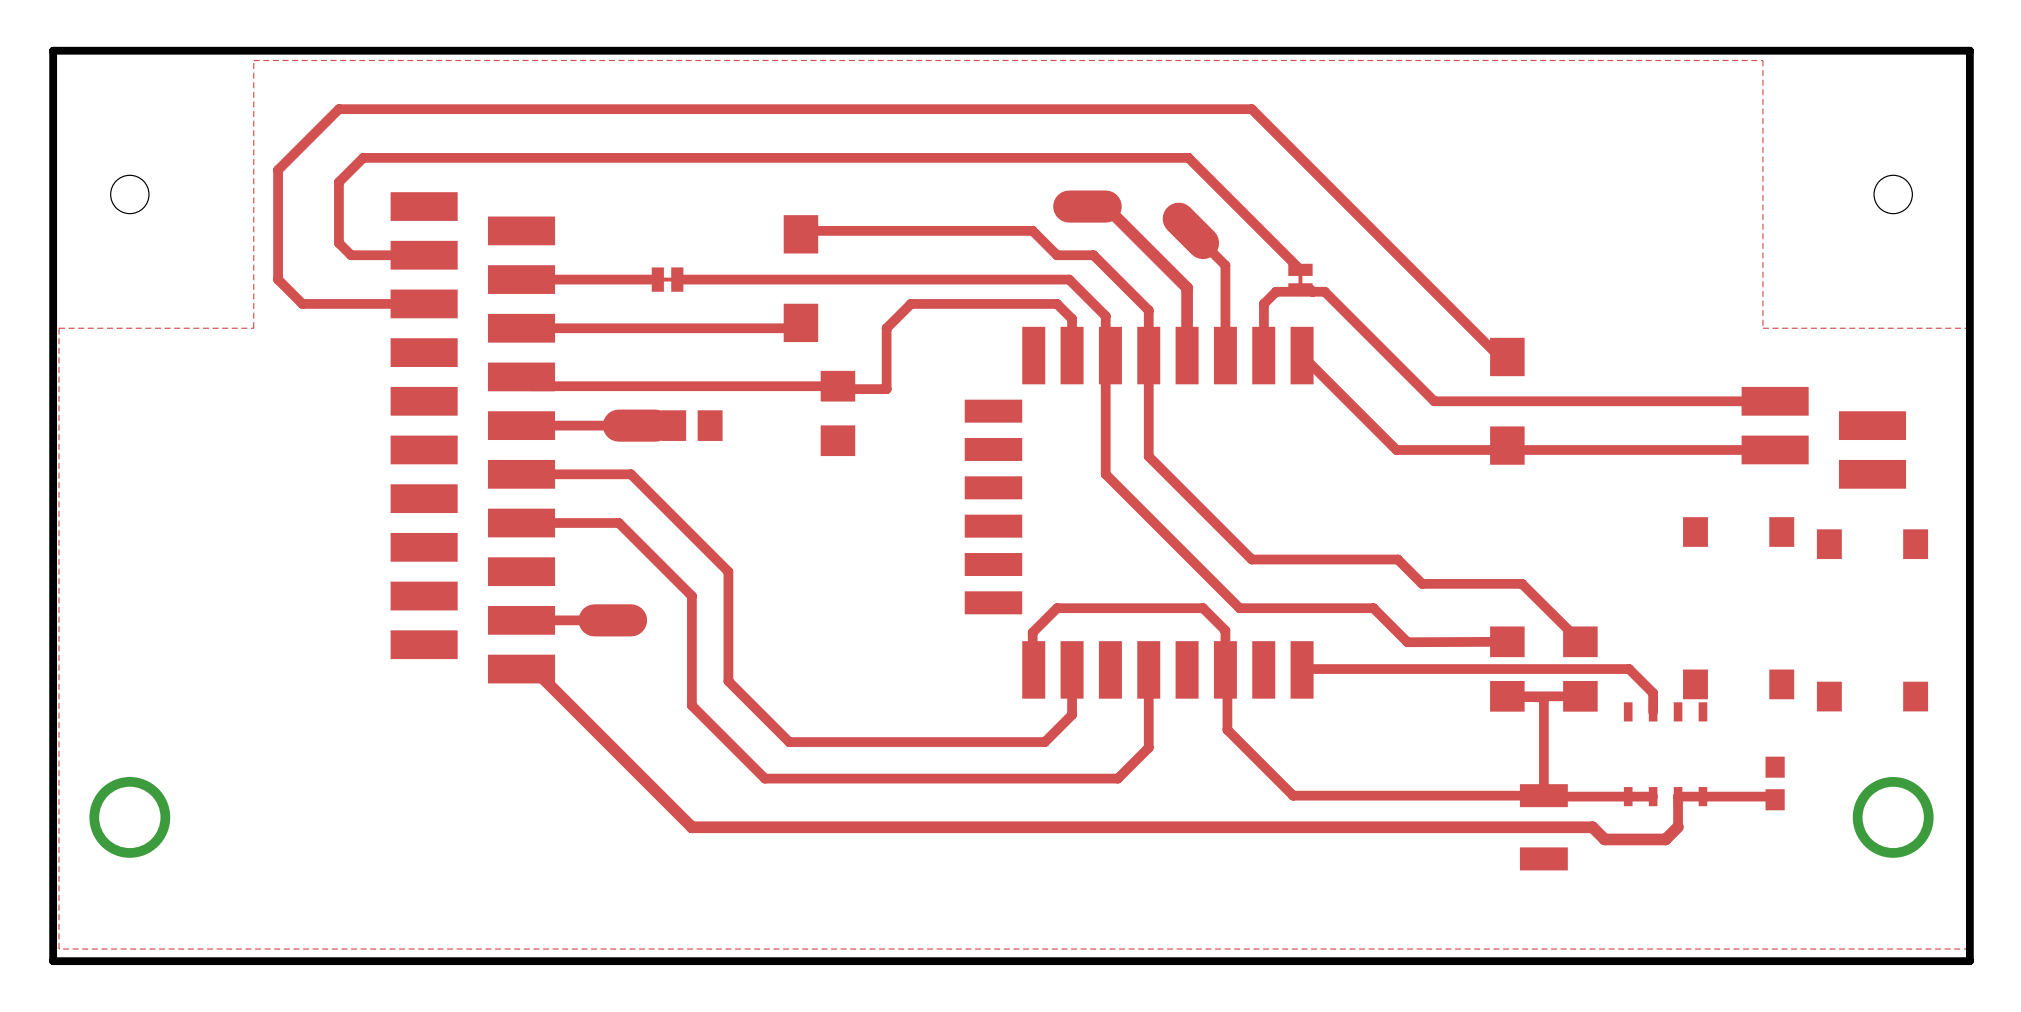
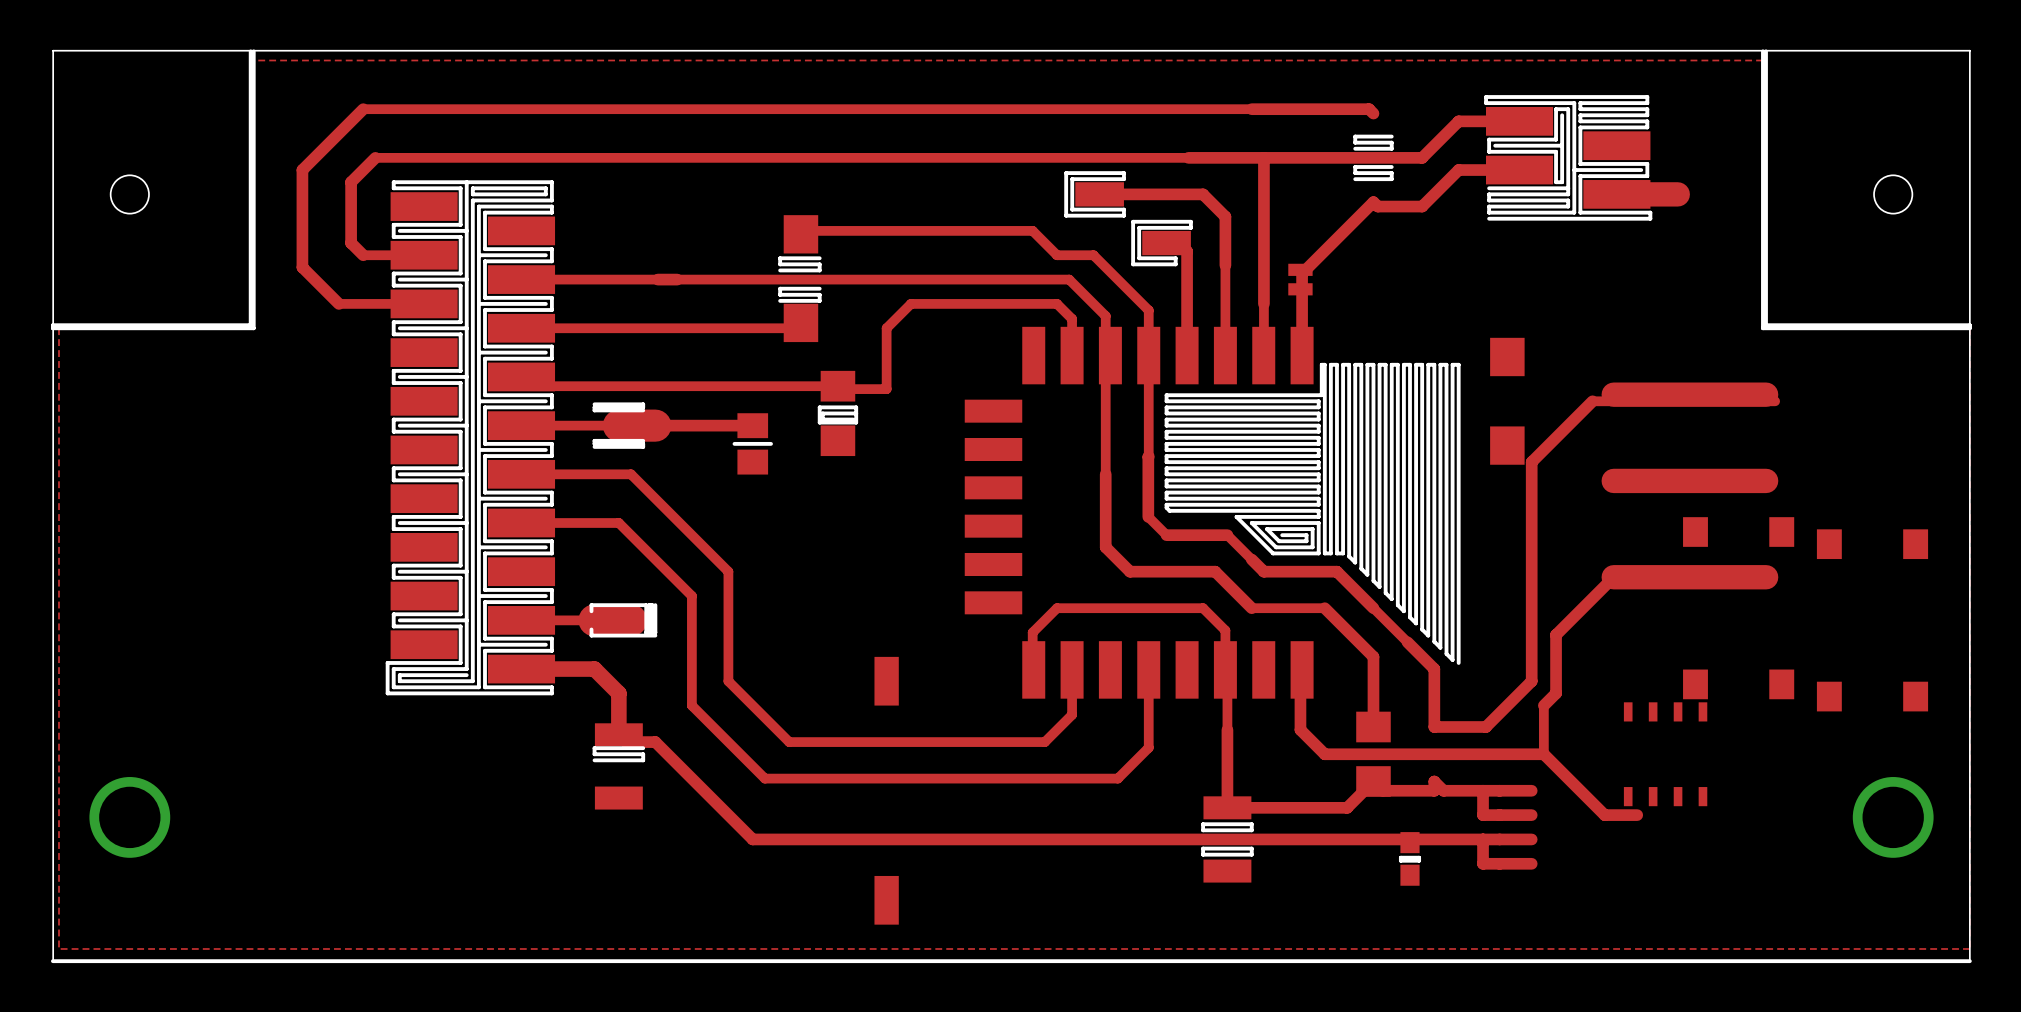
board edge width: thick (1969, 50) (53, 50) (53, 961) (1969, 961) (1969, 50) -> thin (1969, 50) (53, 50) (53, 961) (1969, 961) (1969, 50)
board edge: none -> (253, 51) (253, 328) (52, 328) (52, 325) (250, 325) (250, 51)
board edge: none -> (1762, 51) (1762, 328) (1969, 328)
board edge: none -> (1766, 51) (1766, 325) (1969, 325)
top track: (363, 109) (338, 109) (278, 170) (278, 279) (302, 303) (338, 303) -> (363, 109) (302, 170) (302, 267) (338, 303)
top track: (1251, 109) (1495, 352) (1507, 356) -> (1251, 109) (1369, 109) (1373, 113)
board edge: none -> (1562, 115) (1562, 182) (1556, 182) (1556, 151) (1489, 151) (1489, 139) (1556, 139) (1556, 109) (1568, 109) (1568, 194) (1489, 194) (1489, 200) (1568, 200) (1568, 206) (1489, 206) (1489, 212) (1574, 212) (1574, 103) (1486, 103) (1486, 97) (1647, 97) (1647, 103) (1580, 103) (1580, 109) (1647, 109) (1647, 115) (1580, 115) (1580, 121) (1647, 121) (1647, 127) (1580, 127) (1580, 163) (1647, 163) (1647, 176) (1580, 176) (1580, 212) (1650, 212) (1650, 218) (1489, 218)
board edge: none -> (1391, 136) (1355, 136) (1355, 142) (1391, 142) (1391, 148) (1355, 148)
board edge: none -> (1562, 145) (1495, 145)
top track: (375, 157) (363, 157) (338, 182) (338, 243) (351, 255) (363, 255) -> (375, 157) (351, 182) (351, 243) (363, 255)
top track: (1188, 157) (1300, 269) -> (1188, 157) (1422, 157) (1458, 121) (1519, 121)
board edge: none -> (1391, 166) (1355, 166) (1355, 173) (1391, 173) (1391, 179) (1355, 179)
board edge: none -> (1641, 170) (1574, 170)
board edge: none -> (1123, 173) (1066, 173) (1066, 215) (1123, 215) (1123, 209) (1072, 209) (1072, 179) (1123, 179) (1123, 173)
board edge: none -> (466, 182) (466, 669) (393, 669) (393, 687) (478, 687) (478, 206) (551, 206) (551, 212) (484, 212) (484, 249) (551, 249) (551, 261) (484, 261) (484, 297) (551, 297) (551, 310) (484, 310) (484, 346) (551, 346) (551, 358) (484, 358) (484, 395) (551, 395) (551, 407) (484, 407) (484, 443) (551, 443) (551, 456) (484, 456) (484, 492) (551, 492) (551, 504) (484, 504) (484, 541) (551, 541) (551, 553) (484, 553) (484, 589) (551, 589) (551, 602) (484, 602) (484, 638) (551, 638) (551, 650) (484, 650) (484, 687) (551, 687) (551, 693) (387, 693) (387, 662) (460, 662) (460, 626) (393, 626) (393, 614) (460, 614) (460, 577) (393, 577) (393, 565) (460, 565) (460, 529) (393, 529) (393, 516) (460, 516) (460, 480) (393, 480) (393, 468) (460, 468) (460, 431) (393, 431) (393, 419) (460, 419) (460, 383) (393, 383) (393, 370) (460, 370) (460, 334) (393, 334) (393, 322) (460, 322) (460, 285) (393, 285) (393, 273) (460, 273) (460, 236) (393, 236) (393, 224) (460, 224) (460, 188) (393, 188) (393, 182) (551, 182) (551, 200) (472, 200) (472, 681) (399, 681) (399, 675) (466, 675)
board edge: none -> (545, 188) (472, 188) (472, 194) (545, 194) (545, 188)
board edge: none -> (1568, 188) (1489, 188)
part: none -> (1099, 194)
top track: none -> (1677, 194) (1616, 194)
top track: (1069, 206) (1105, 206) (1187, 287) -> (1166, 243) (1178, 243) (1187, 251) (1187, 287)
top track: (1178, 218) (1225, 265) -> (1099, 194) (1203, 194) (1225, 216) (1225, 265)
board edge: none -> (1190, 221) (1133, 221) (1133, 264) (1175, 264) (1175, 258) (1139, 258) (1139, 227) (1190, 227) (1190, 221)
board edge: none -> (466, 230) (399, 230)
part: none -> (1166, 243)
board edge: none -> (545, 255) (478, 255)
board edge: none -> (819, 258) (780, 258) (780, 264) (819, 264) (819, 270) (780, 270)
board edge: none -> (466, 279) (399, 279)
part: (667, 279) -> none
top track: none -> (677, 279) (657, 279)
board edge: none -> (819, 288) (780, 288) (780, 294) (819, 294) (819, 300) (780, 300)
board edge: none -> (545, 303) (478, 303)
top track: (1263, 303) (1276, 291) (1324, 291) (1434, 401) (1592, 401) -> (1263, 303) (1263, 157)
board edge: none -> (466, 328) (399, 328)
board edge: none -> (545, 352) (478, 352)
top track: (1302, 355) (1396, 449) (1775, 449) -> (1302, 355) (1302, 273) (1373, 202) (1377, 206) (1422, 206) (1458, 170) (1519, 170)
board edge: none -> (466, 376) (399, 376)
top track: none -> (1766, 394) (1613, 394) (1698, 395)
board edge: none -> (545, 401) (478, 401)
board edge: none -> (594, 404) (643, 404) (643, 407) (594, 407) (594, 410) (643, 410)
board edge: none -> (856, 407) (819, 407) (819, 422) (856, 422) (856, 407)
board edge: none -> (856, 413) (822, 413) (822, 419) (853, 419)
board edge: none -> (466, 425) (399, 425)
part rotation: 0° (691, 425) -> 90° clockwise (752, 443)
part position: (691, 425) -> (752, 443)
top track: none -> (752, 425) (655, 425)
part position: (1823, 437) -> (1568, 157)
board edge: none -> (643, 440) (594, 440) (594, 443) (643, 443) (643, 446) (594, 446)
board edge: none -> (771, 443) (734, 443)
board edge: none -> (545, 449) (478, 449)
top track: (1148, 456) (1227, 535) -> none
board edge: none -> (466, 474) (399, 474)
top track: (1105, 474) (1148, 516) -> (1148, 456) (1148, 516)
top track: none -> (1105, 474) (1105, 547) (1130, 571) (1215, 571) (1251, 608)
top track: none -> (1766, 480) (1613, 480)
board edge: none -> (545, 498) (478, 498)
board edge: none -> (466, 523) (399, 523)
top track: (1166, 535) (1239, 608) (1251, 608) -> (1166, 535) (1227, 535)
board edge: none -> (1282, 535) (1306, 535) (1306, 541) (1279, 541) (1266, 529) (1312, 529) (1312, 547) (1276, 547) (1251, 523) (1318, 523) (1318, 553) (1273, 553) (1236, 516) (1318, 516) (1318, 510) (1169, 510) (1166, 504) (1318, 504) (1318, 498) (1166, 498) (1166, 492) (1318, 492) (1318, 486) (1166, 486) (1166, 480) (1318, 480) (1318, 474) (1166, 474) (1166, 468) (1318, 468) (1318, 462) (1166, 462) (1166, 456) (1318, 456) (1318, 449) (1166, 449) (1166, 443) (1318, 443) (1318, 437) (1166, 437) (1166, 431) (1318, 431) (1318, 425) (1166, 425) (1166, 419) (1318, 419) (1318, 413) (1166, 413) (1166, 407) (1318, 407) (1318, 401) (1166, 401) (1166, 395) (1321, 395) (1321, 364) (1324, 364) (1324, 553) (1330, 553) (1330, 364) (1336, 364) (1336, 553) (1343, 553) (1343, 364) (1349, 364) (1349, 556) (1355, 562) (1355, 364) (1361, 364) (1361, 568) (1367, 574) (1367, 364) (1373, 364) (1373, 580) (1379, 586) (1379, 364) (1385, 364) (1385, 592) (1391, 599) (1391, 364) (1397, 364) (1397, 605) (1403, 611) (1403, 364) (1409, 364) (1409, 617) (1416, 623) (1416, 364) (1422, 364) (1422, 629) (1428, 635) (1428, 364) (1434, 364) (1434, 641) (1440, 647) (1440, 364) (1446, 364) (1446, 653) (1452, 659) (1452, 364) (1458, 364) (1458, 662)
board edge: none -> (545, 547) (478, 547)
top track: (1251, 559) (1397, 559) (1422, 583) (1522, 583) (1580, 641) -> none
board edge: none -> (466, 571) (399, 571)
board edge: none -> (545, 596) (478, 596)
board edge: none -> (655, 605) (655, 632) (652, 632) (652, 605) (649, 605) (649, 632) (646, 632) (646, 605) (591, 605) (591, 611)
top track: none -> (1324, 608) (1373, 656) (1373, 726)
top track: (1373, 608) (1324, 608) -> (1373, 608) (1336, 571) (1263, 571) (1251, 559)
board edge: none -> (466, 620) (399, 620)
board edge: none -> (591, 629) (591, 635) (655, 635)
top track: (1507, 641) (1407, 642) -> (1592, 401) (1531, 462) (1531, 681) (1485, 726) (1434, 726) (1434, 669) (1407, 642)
board edge: none -> (545, 644) (478, 644)
top track: (533, 669) (691, 827) (1592, 827) (1604, 839) (1665, 839) (1678, 826) (1678, 796) (1771, 796) (1775, 799) -> (533, 669) (594, 669) (618, 693) (618, 734) (626, 742) (655, 742) (752, 839) (1531, 839)
top track: (1302, 669) (1629, 669) (1653, 693) (1653, 711) -> (1302, 669) (1300, 671) (1300, 729) (1324, 754) (1543, 754) (1604, 815) (1637, 815)
part: (1507, 669) -> none
part: (1580, 669) -> none
part: none -> (886, 681)
top track: (1580, 696) (1507, 696) (1543, 697) (1543, 705) -> (1766, 577) (1613, 577) (1556, 634) (1556, 693) (1543, 705)
top track: (1227, 729) (1293, 795) (1543, 795) -> (1227, 729) (1227, 807) (1347, 807) (1373, 781) (1382, 790) (1434, 790) (1434, 781) (1443, 790) (1531, 790)
board edge: none -> (643, 748) (594, 748) (594, 754) (643, 754) (643, 760) (594, 760)
part: none -> (1373, 754)
top track: (1543, 754) (1543, 795) -> none
part: none -> (618, 766)
part position: (1775, 783) -> (1409, 858)
top track: none -> (1483, 790) (1483, 815) (1531, 815)
top track: (1543, 795) (1653, 796) -> none
board edge: none -> (1251, 824) (1251, 830) (1203, 830) (1203, 824) (1251, 824)
part position: (1543, 827) -> (1227, 839)
top track: none -> (1483, 839) (1483, 863) (1531, 863)
board edge: none -> (1251, 848) (1203, 848) (1203, 854) (1251, 854) (1251, 848)
board edge: none -> (1419, 857) (1400, 857) (1400, 860) (1419, 860) (1419, 857)
part: none -> (886, 900)

